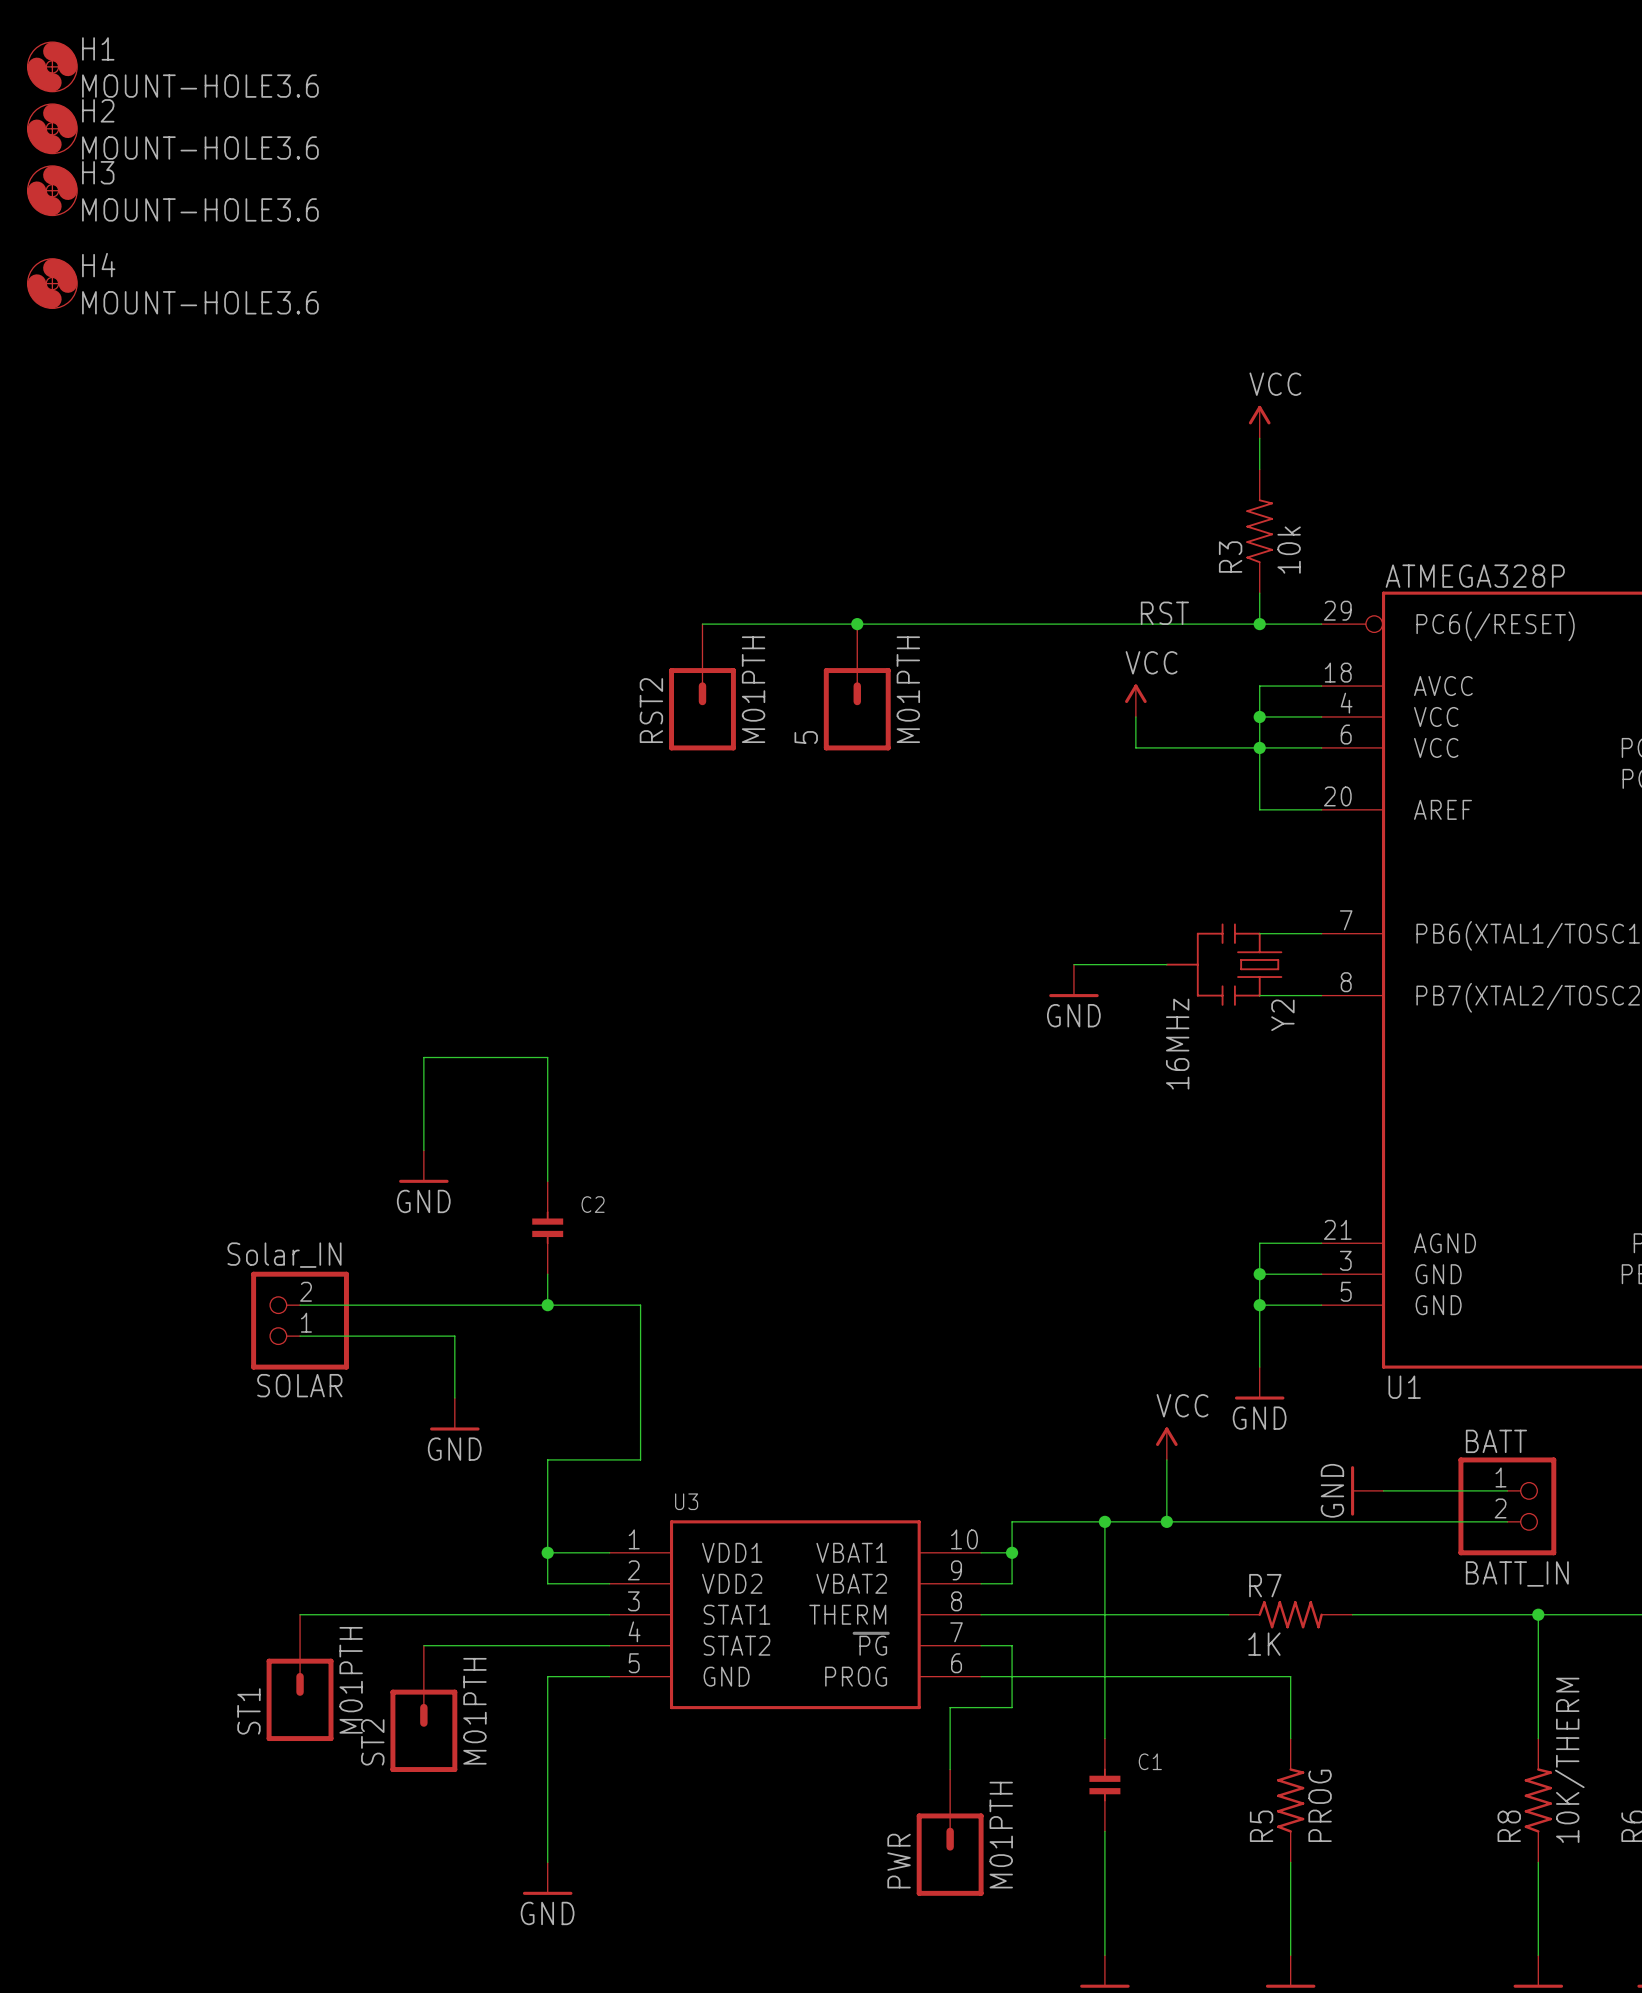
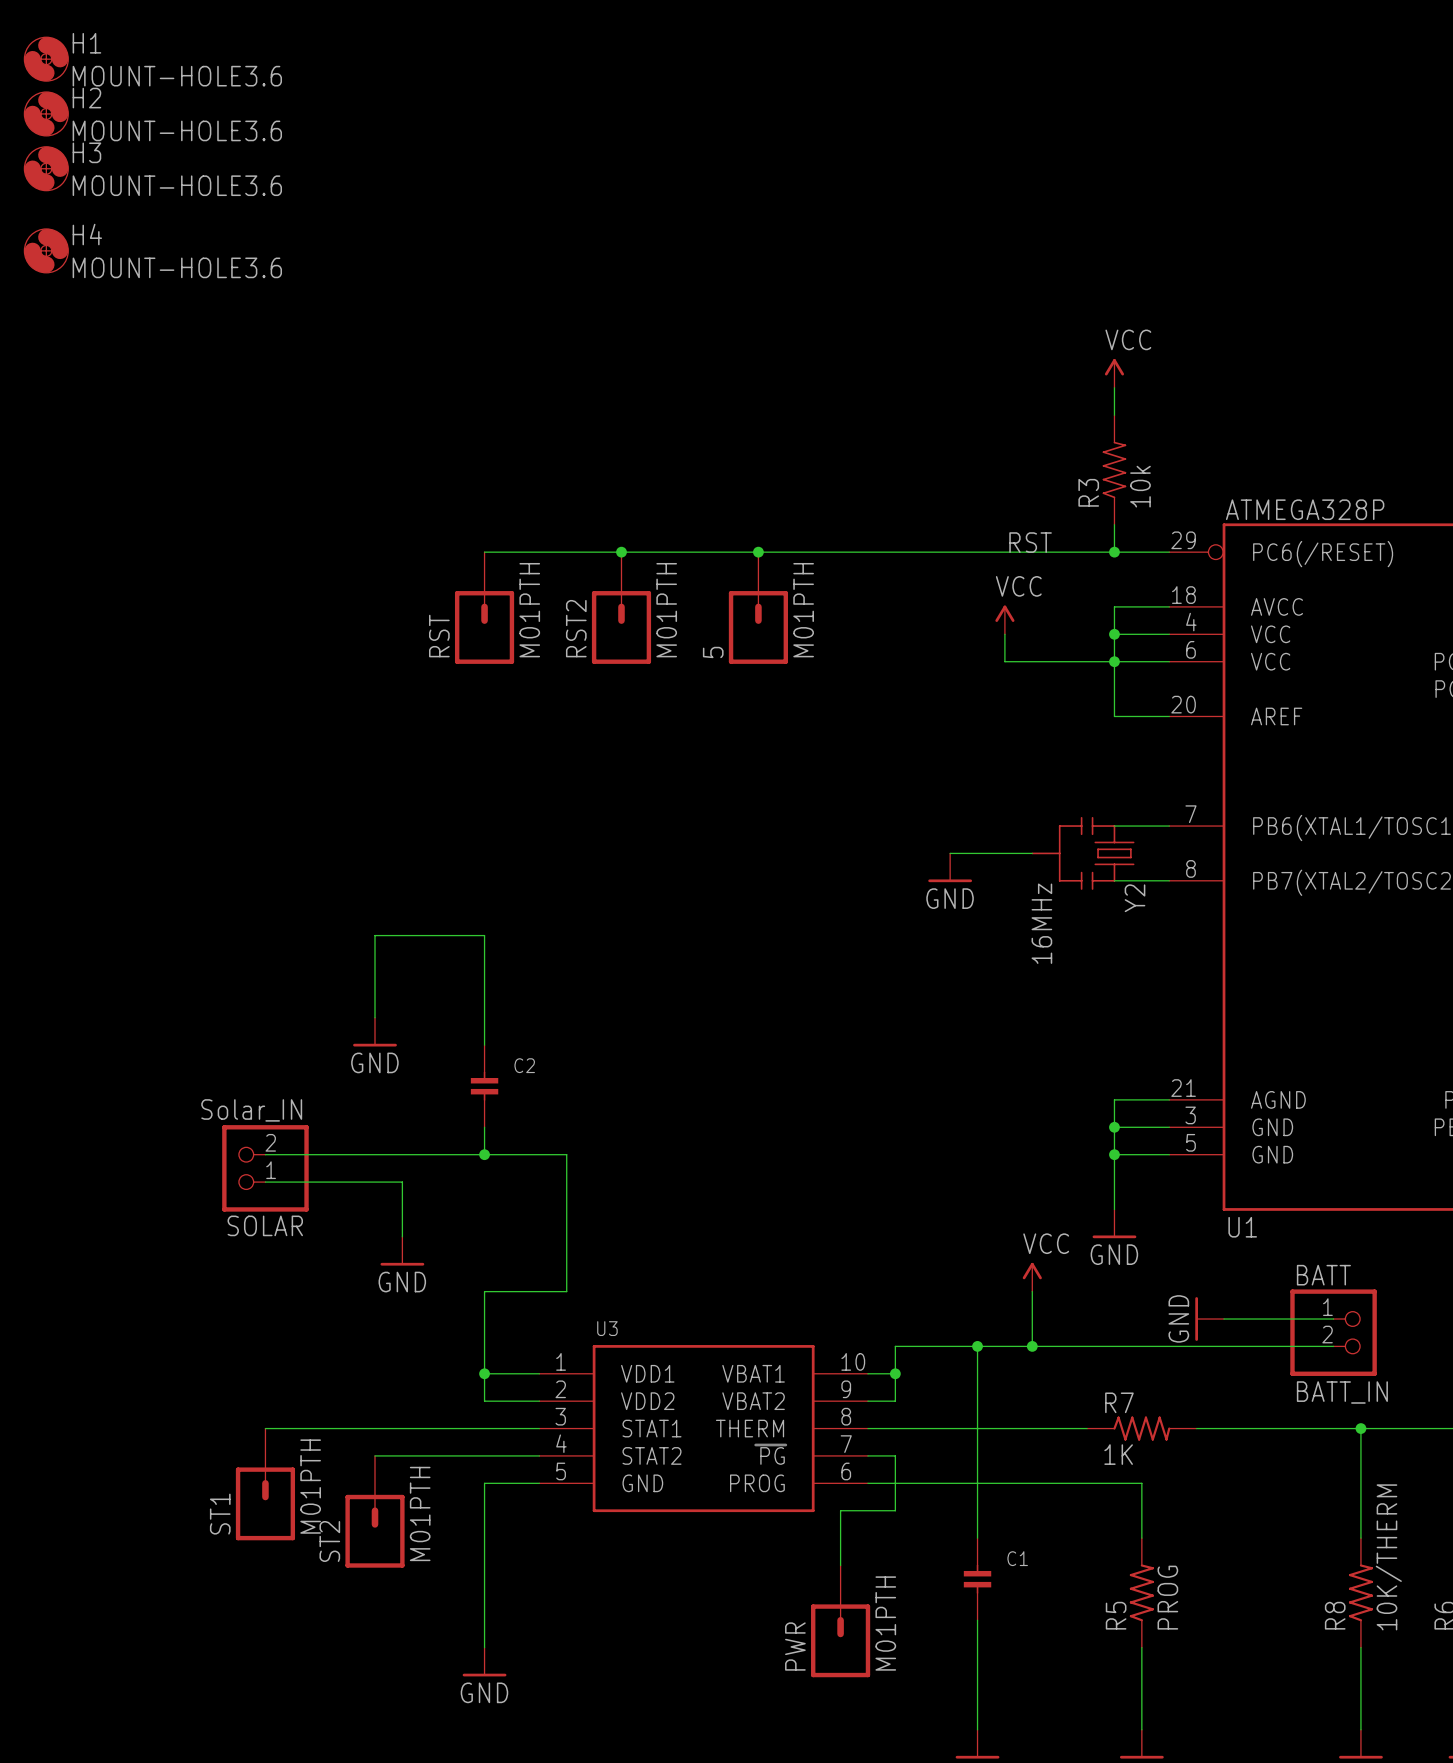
wire: none -> (484, 552) (621, 552)
junction: none -> (621, 552)
RST: none -> M01PTH (484, 608)

